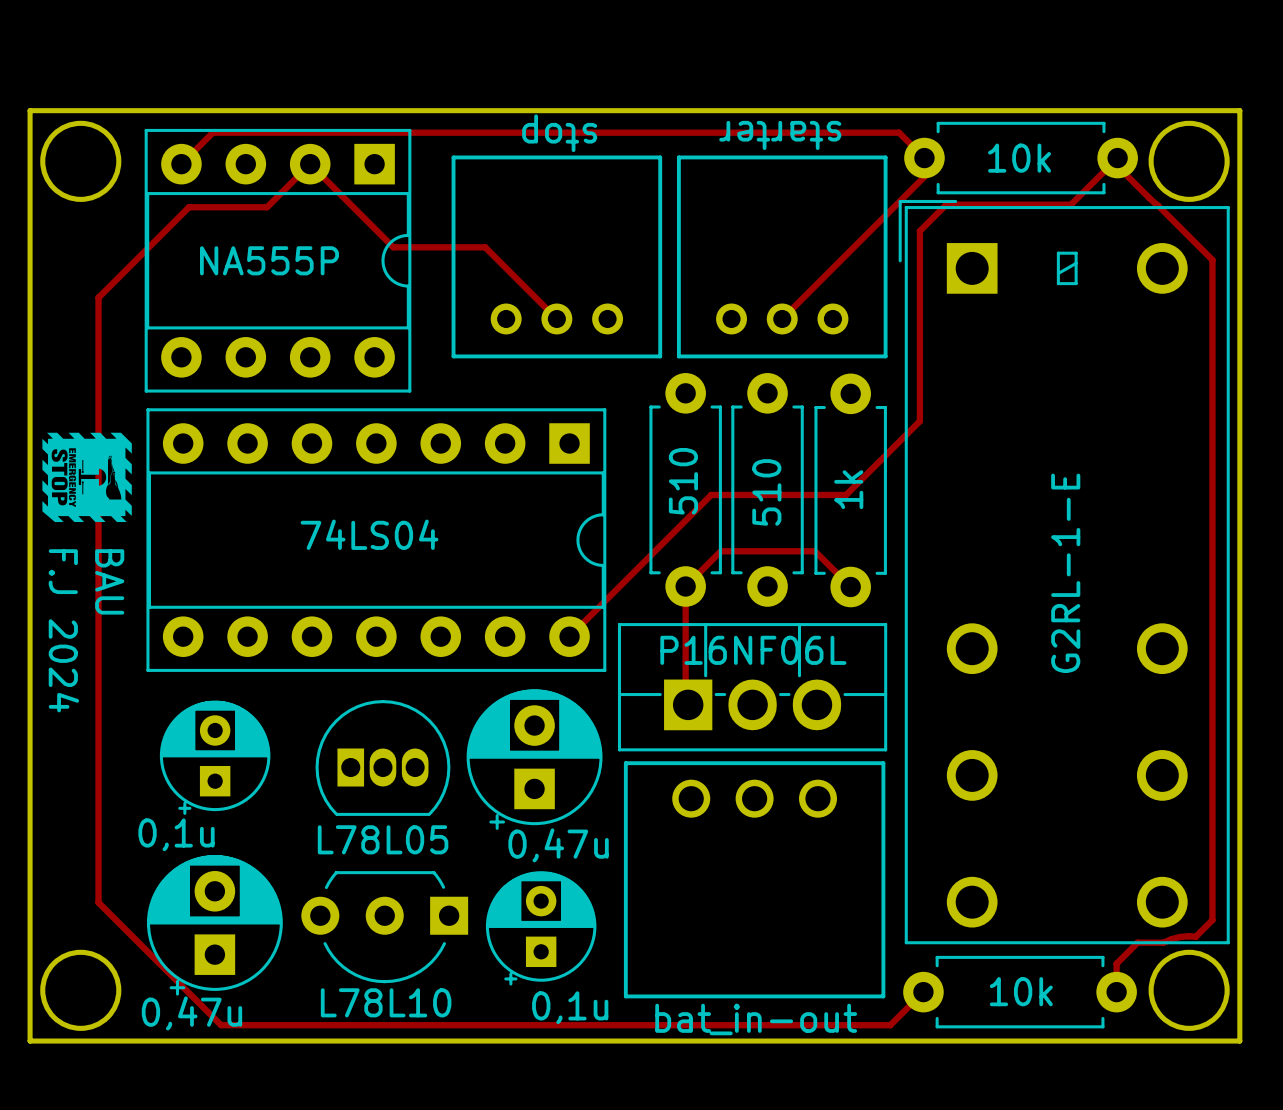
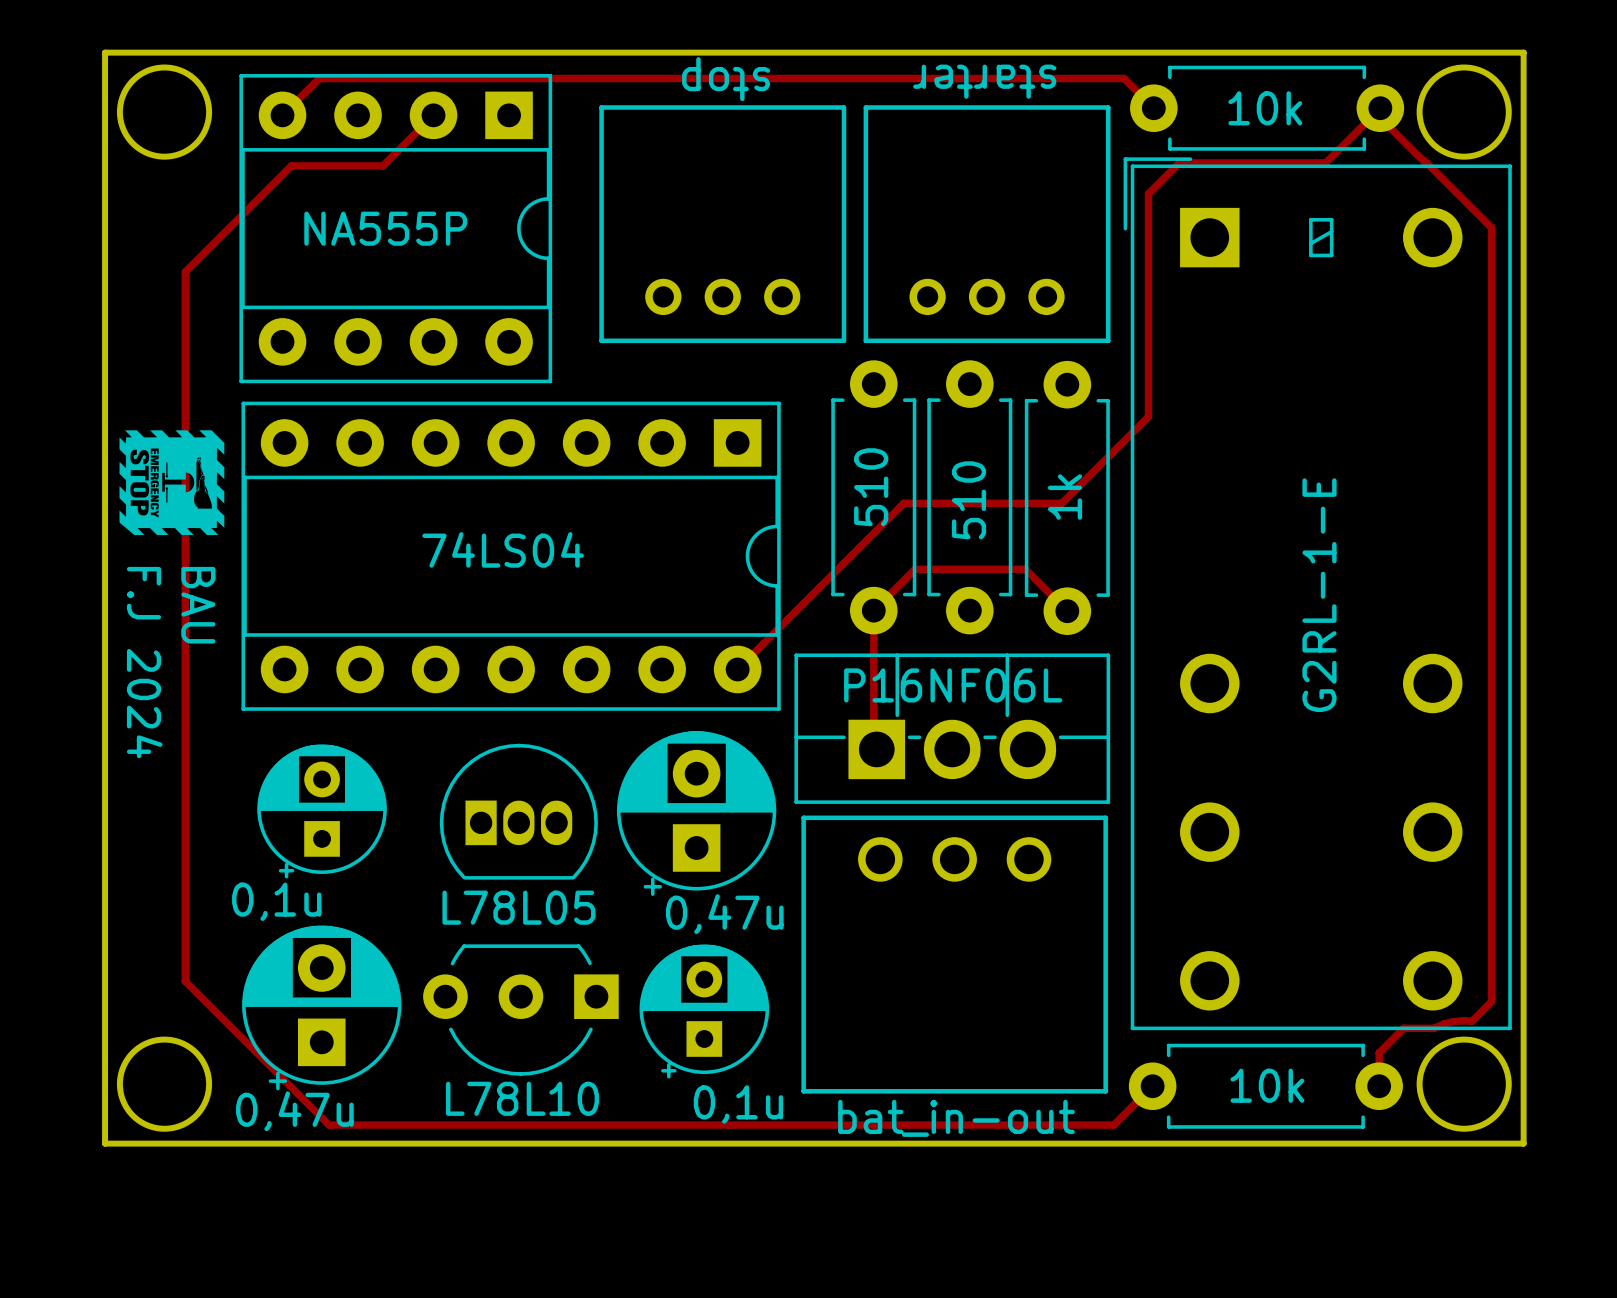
track: (924, 158) (924, 176) (782, 318) -> none
track: (310, 164) (393, 247) (485, 247) (556, 318) -> none

